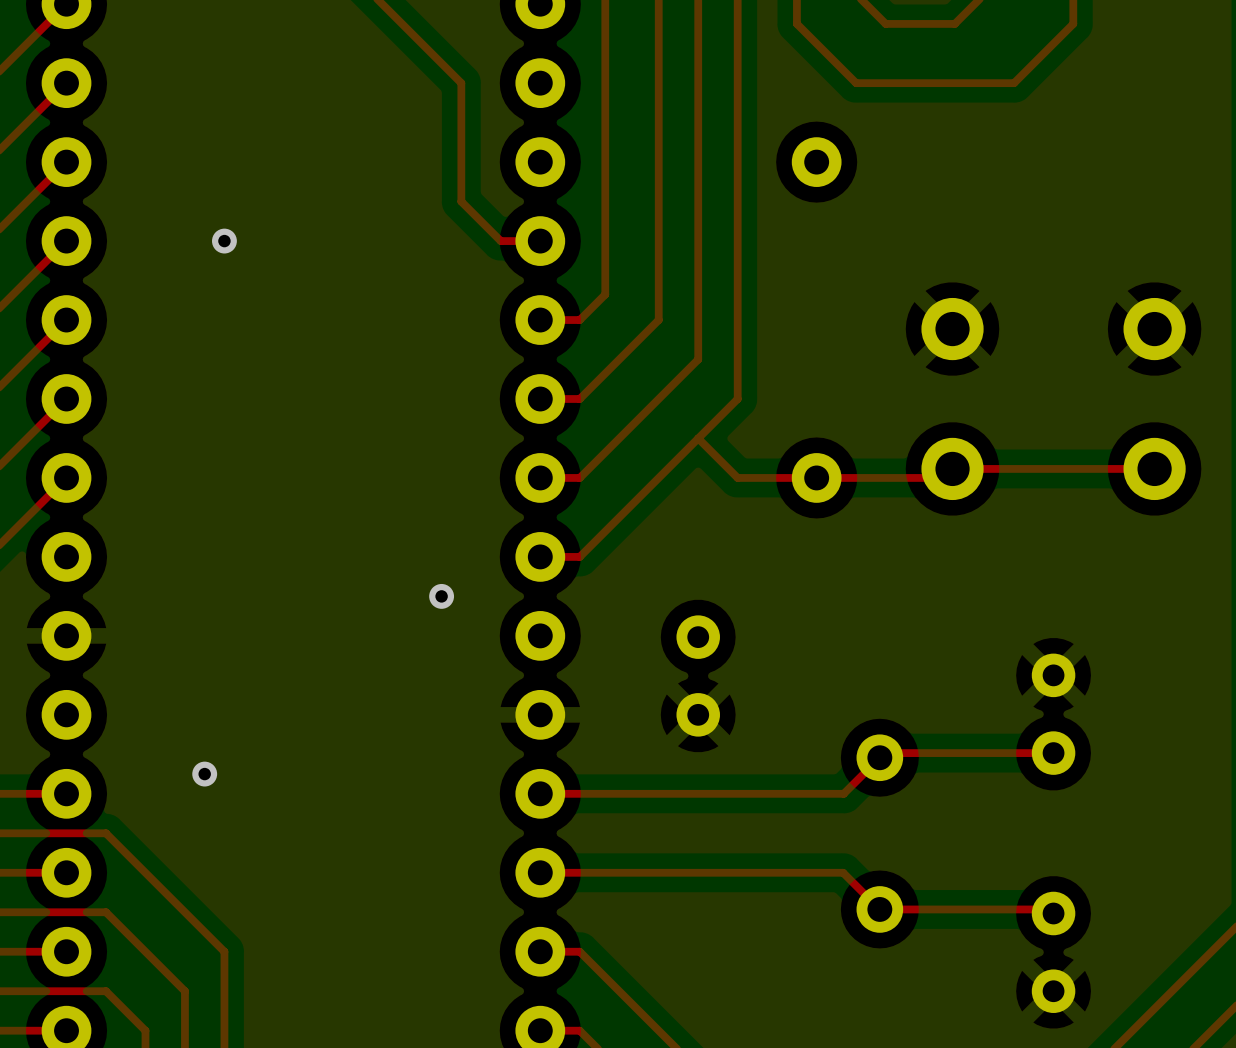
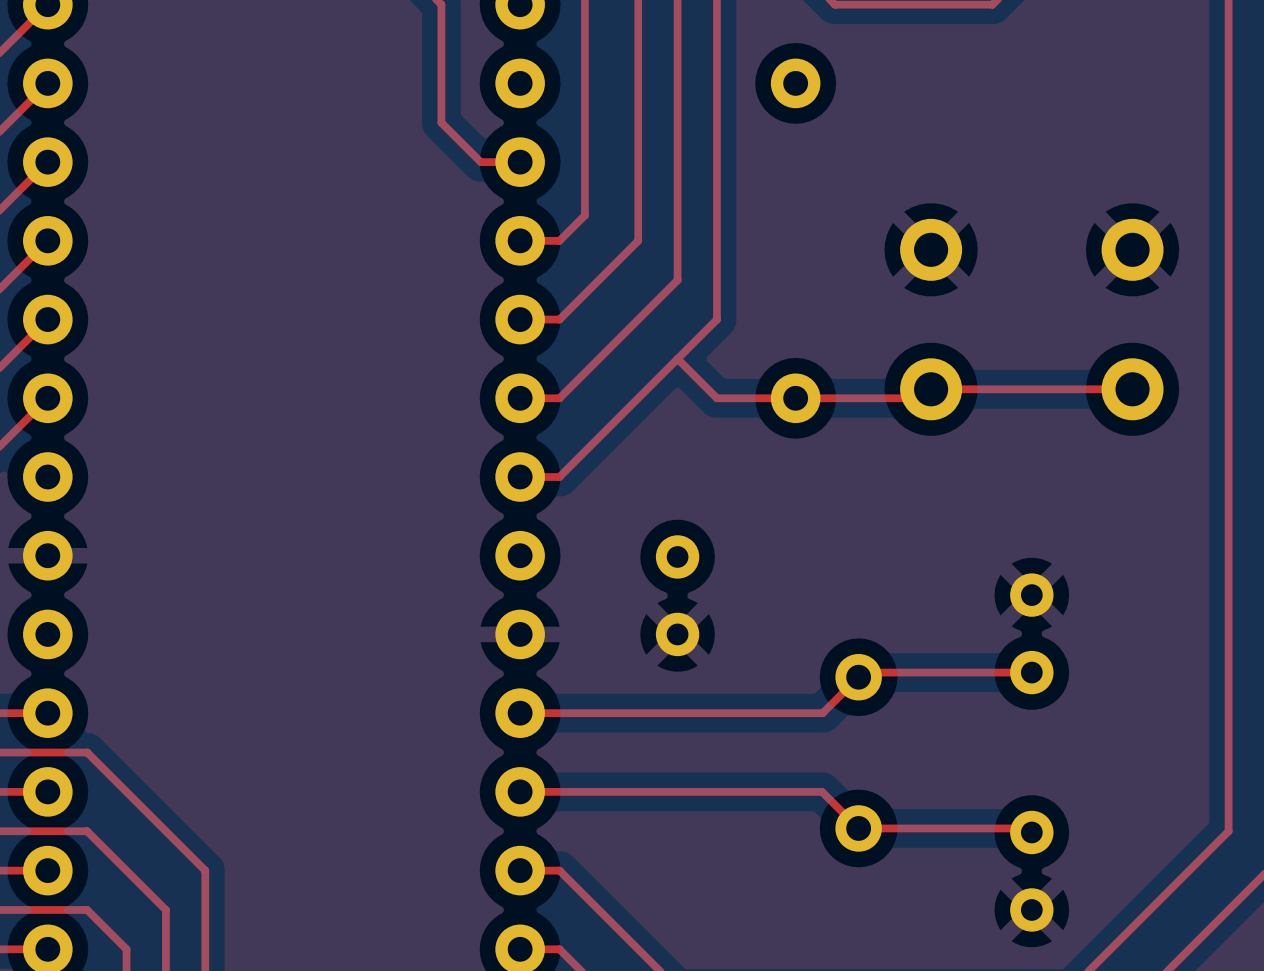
via: (224, 241) -> none
via: (441, 596) -> none
via: (204, 774) -> none

